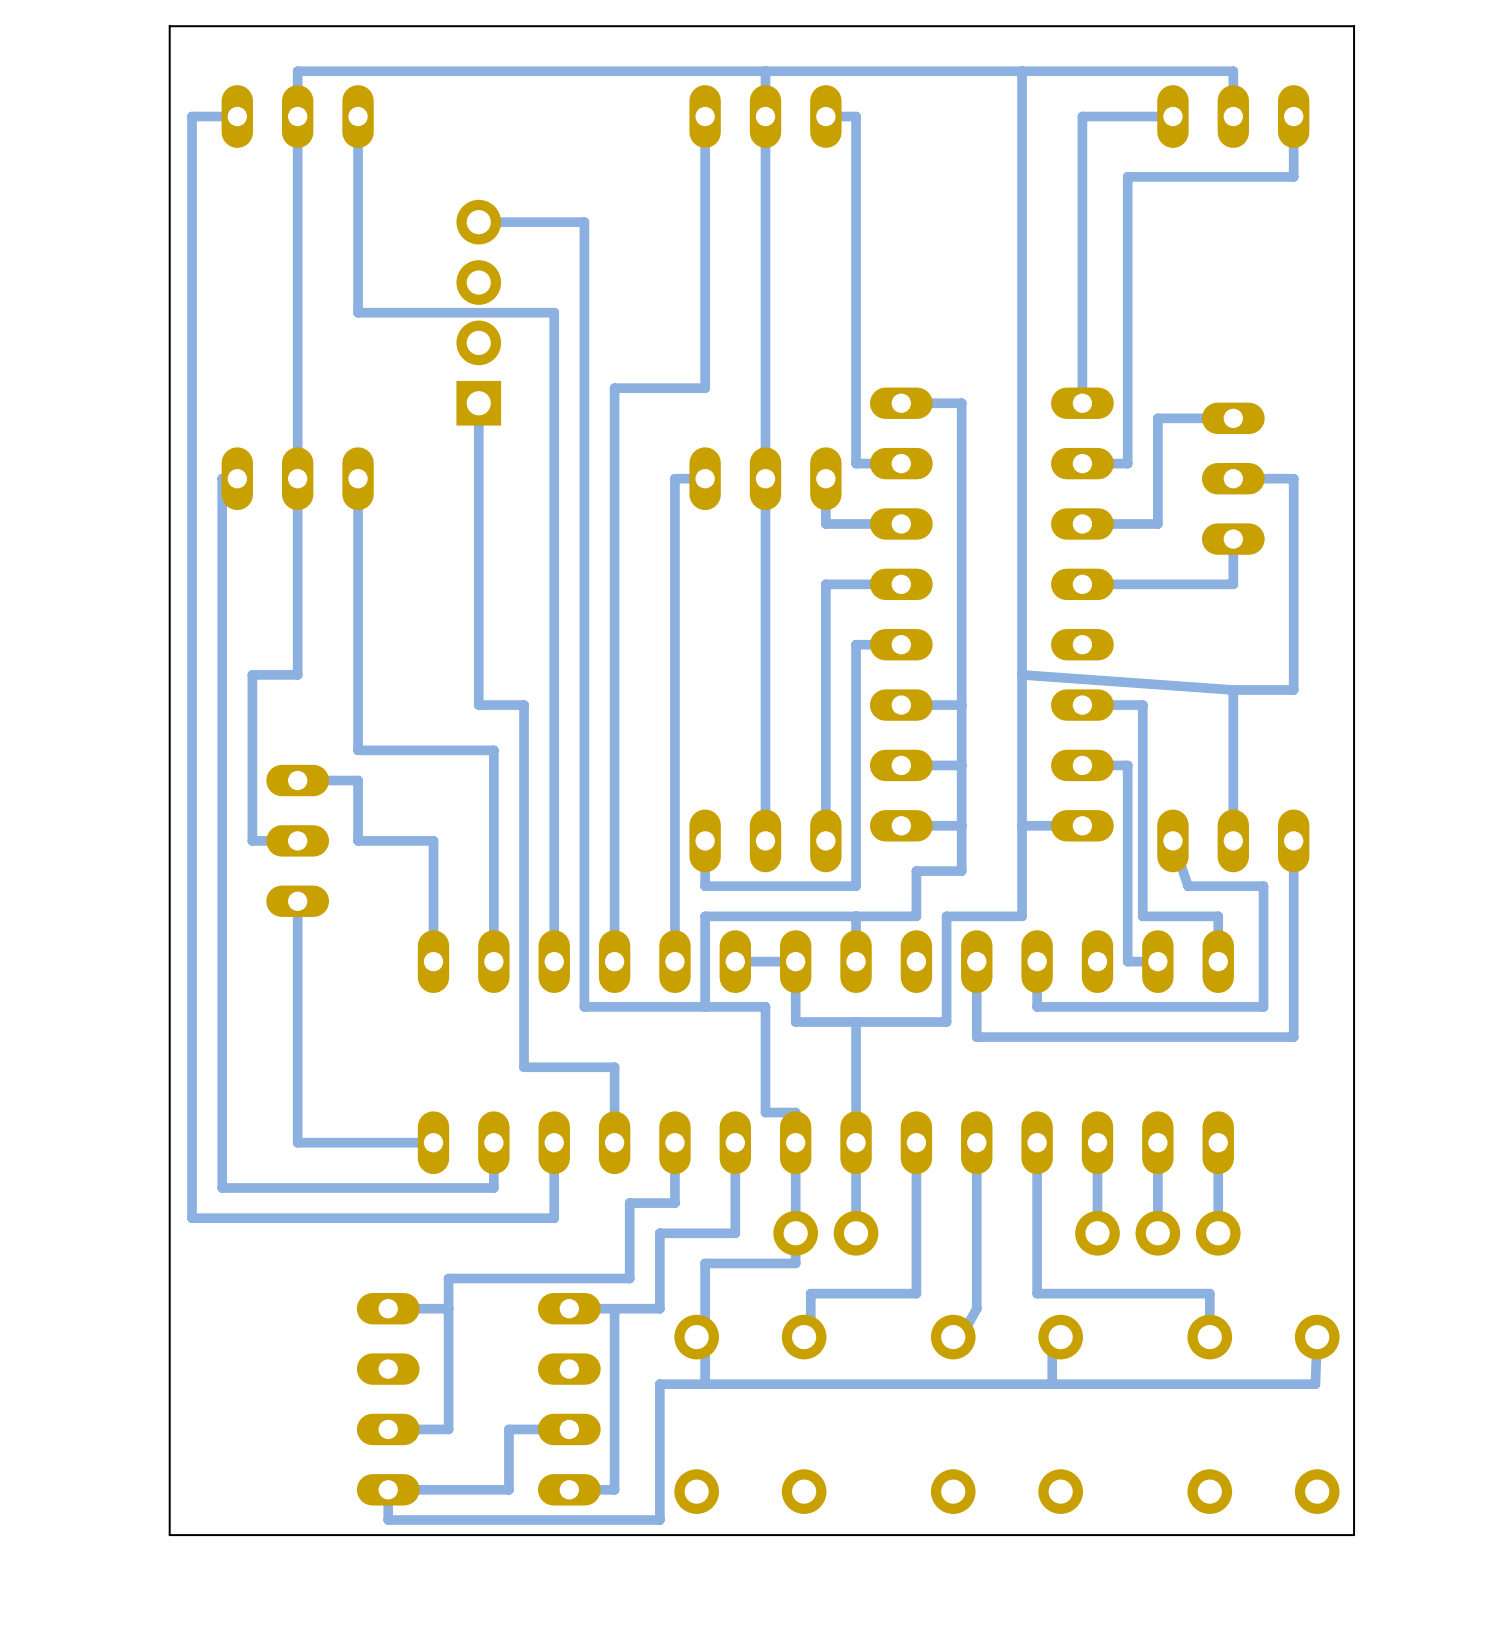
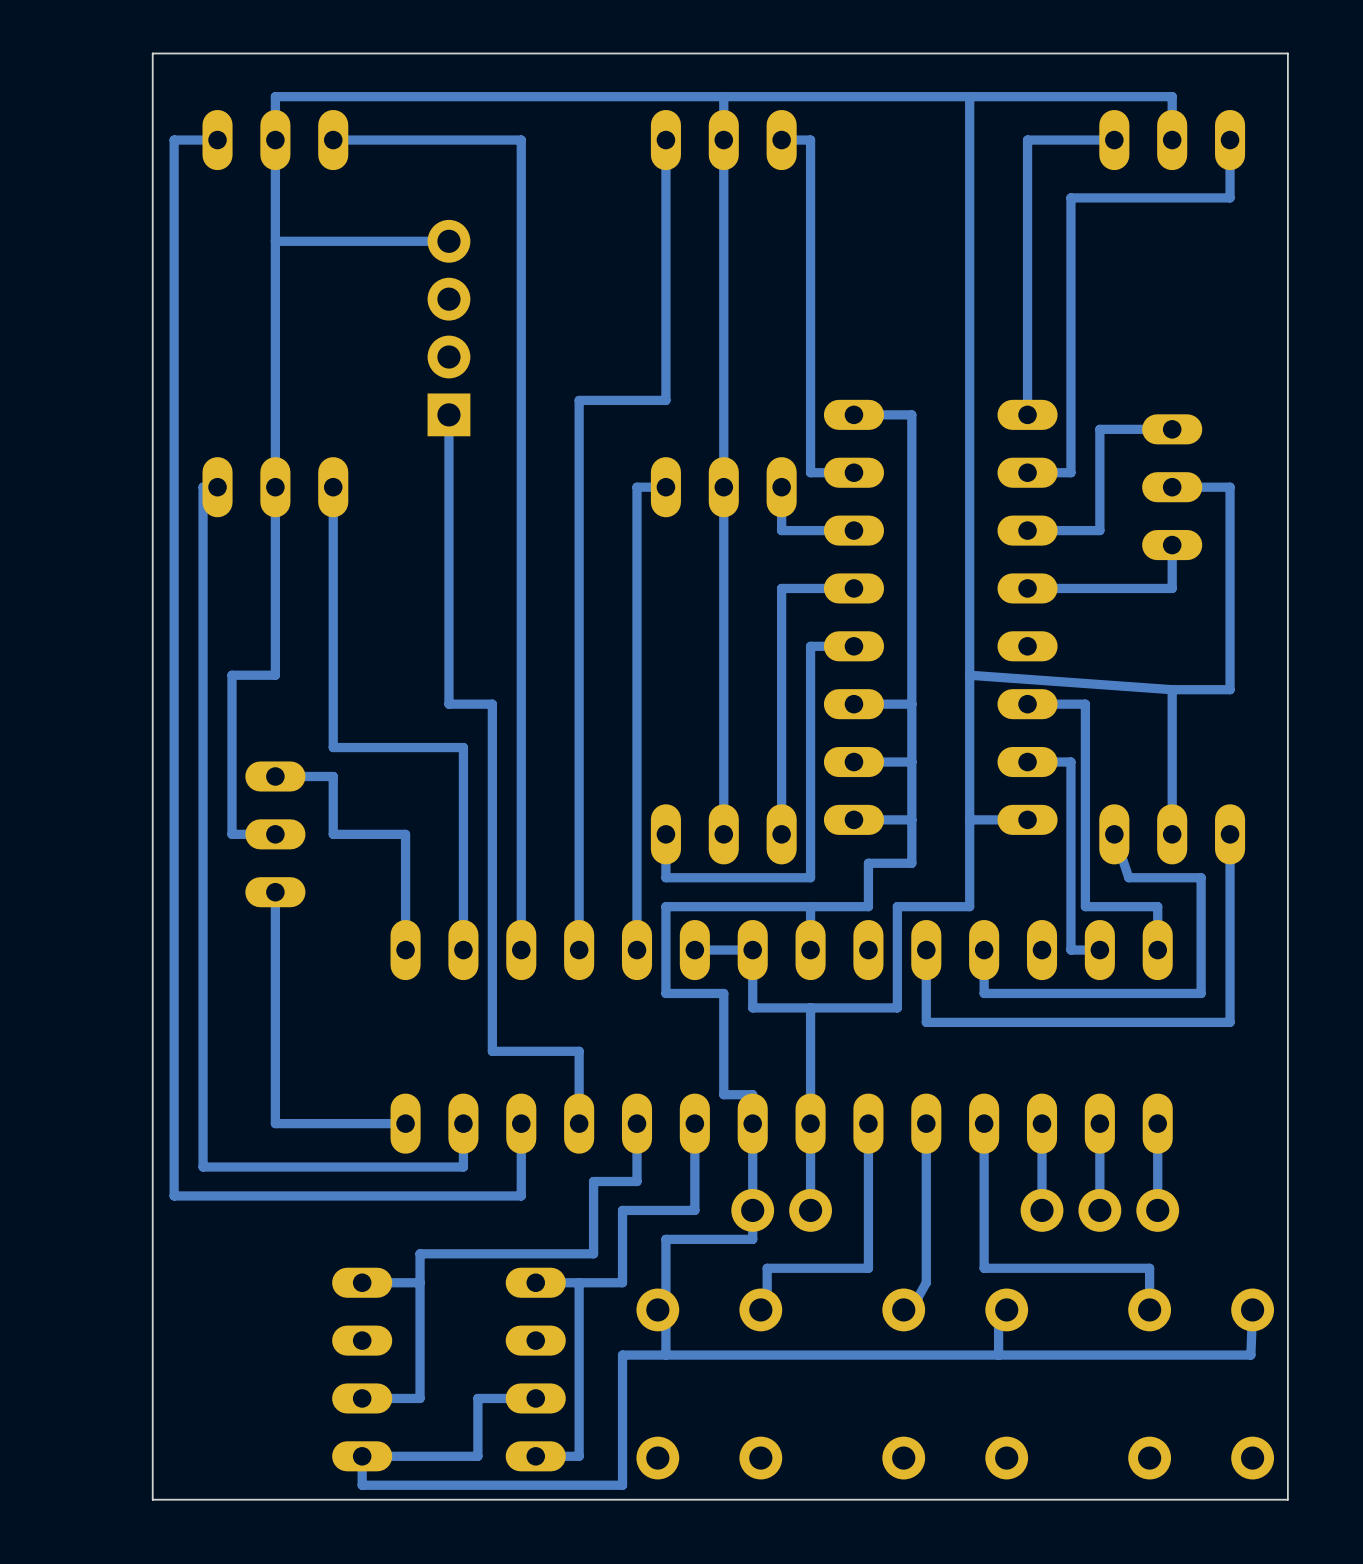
bottom track: (358, 116) (358, 312) (554, 312) -> (333, 140) (521, 140) (521, 328)
bottom track: (478, 222) (584, 222) (584, 1006) (705, 1006) -> (448, 241) (275, 241)

